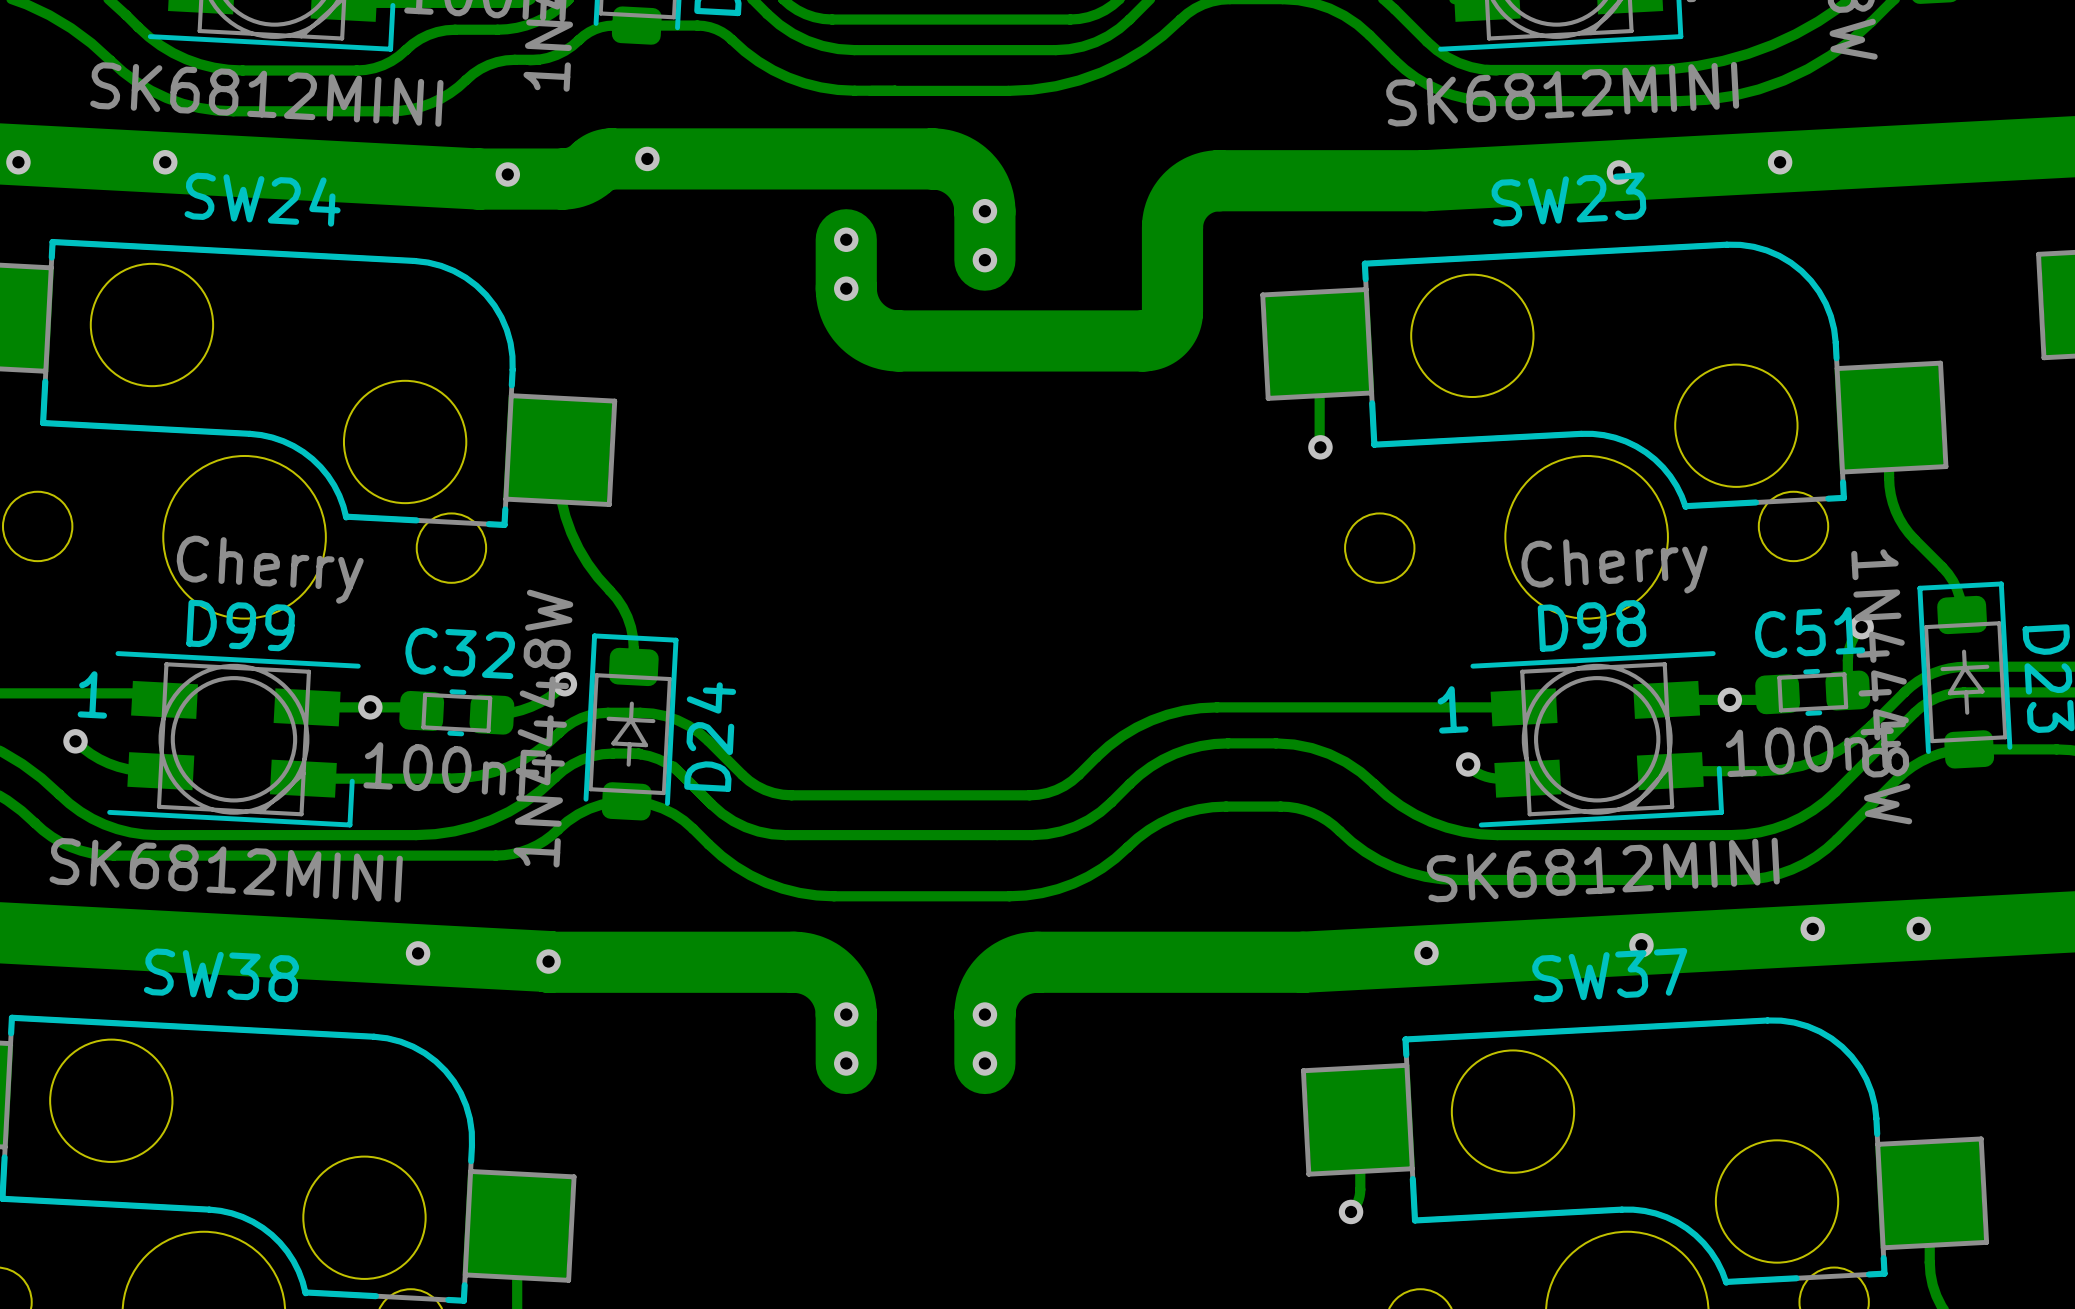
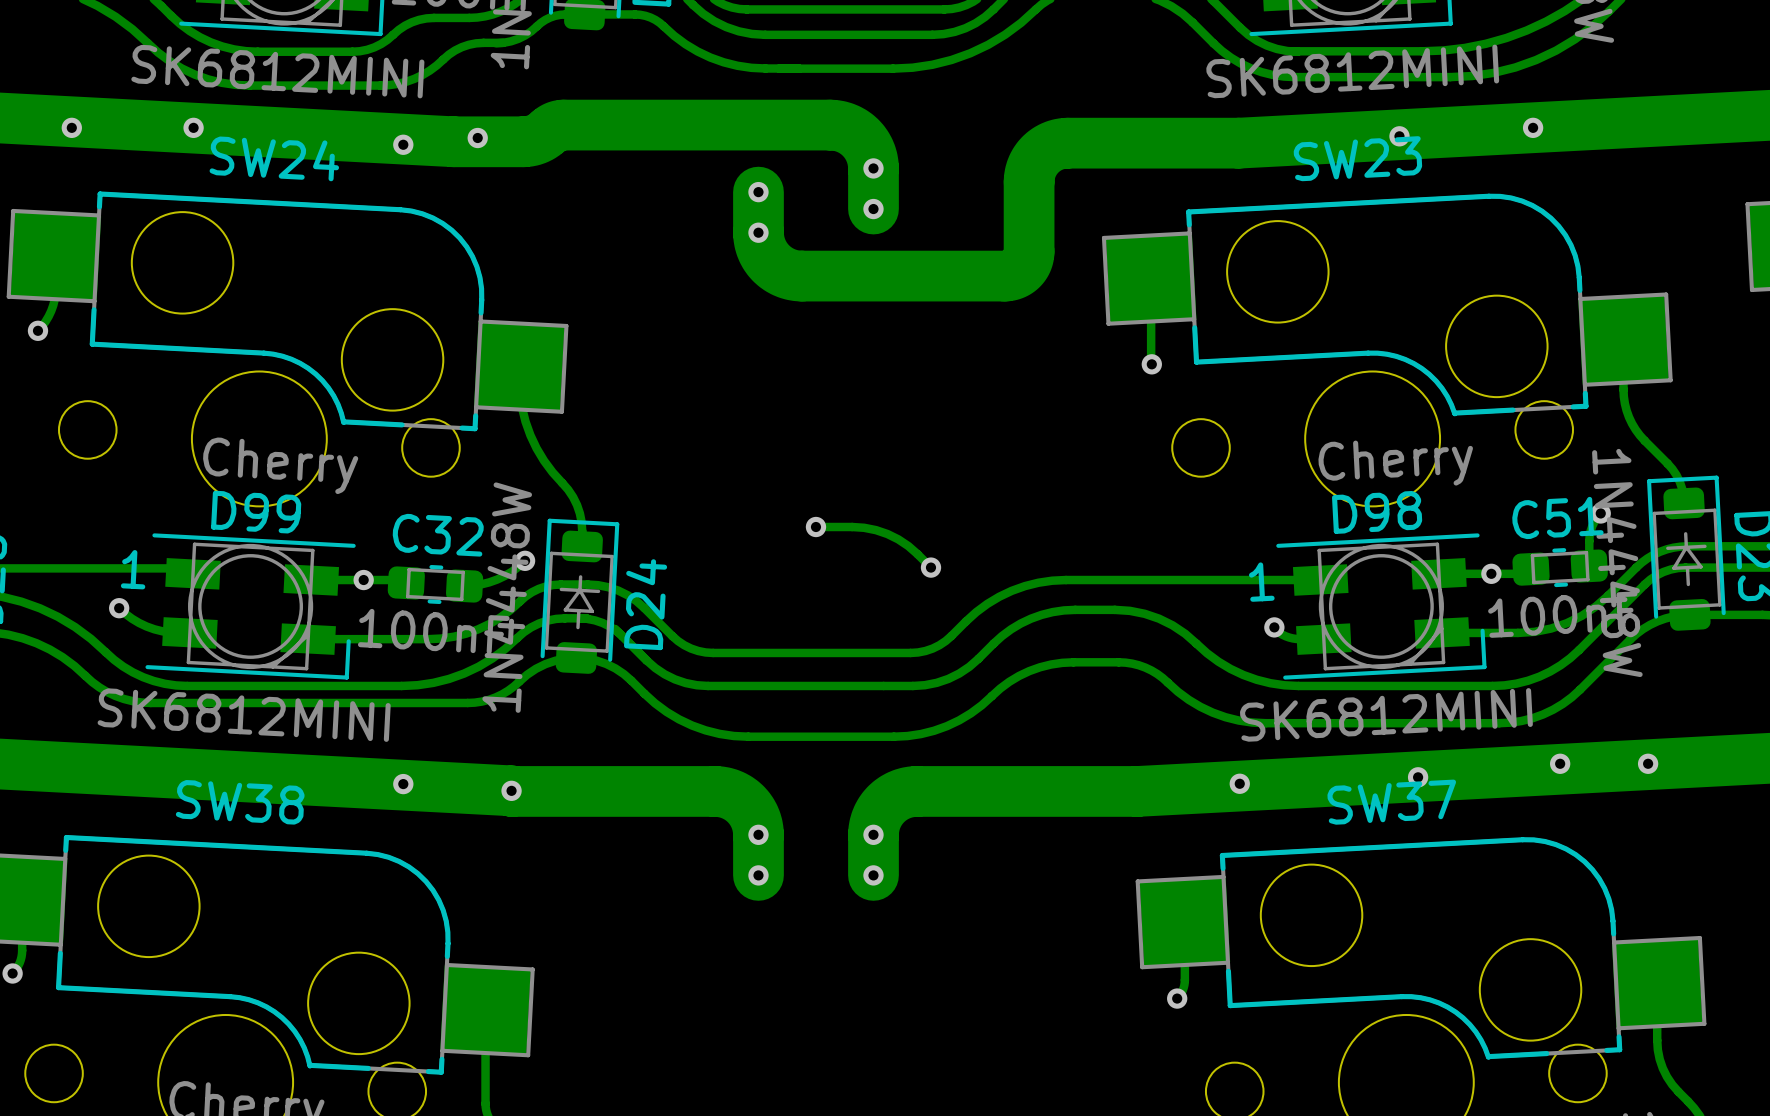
via position: (647, 158) -> (403, 144)
track: none -> (815, 527) (864, 527) (887, 534) (908, 546) (930, 567)
via: none -> (815, 527)
via: none -> (930, 567)

